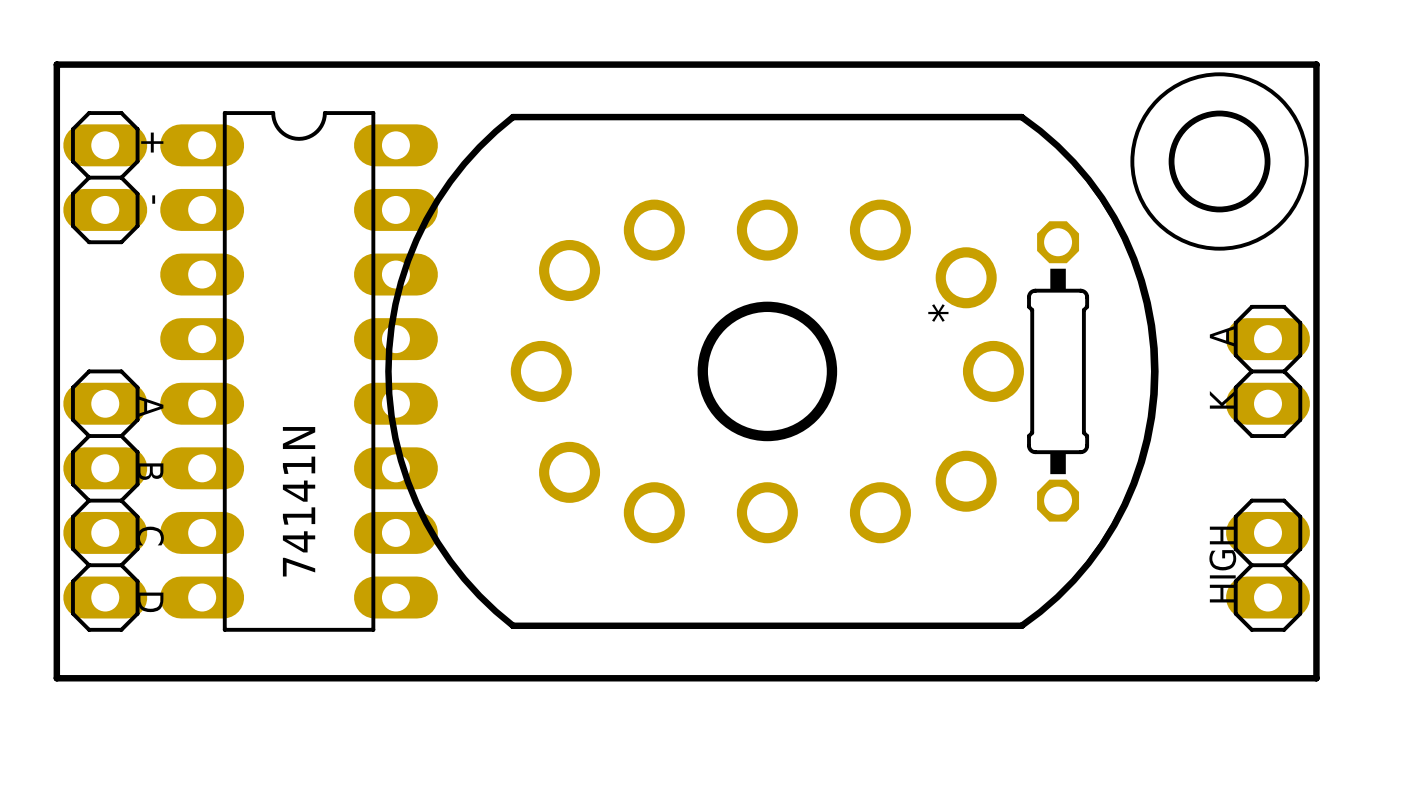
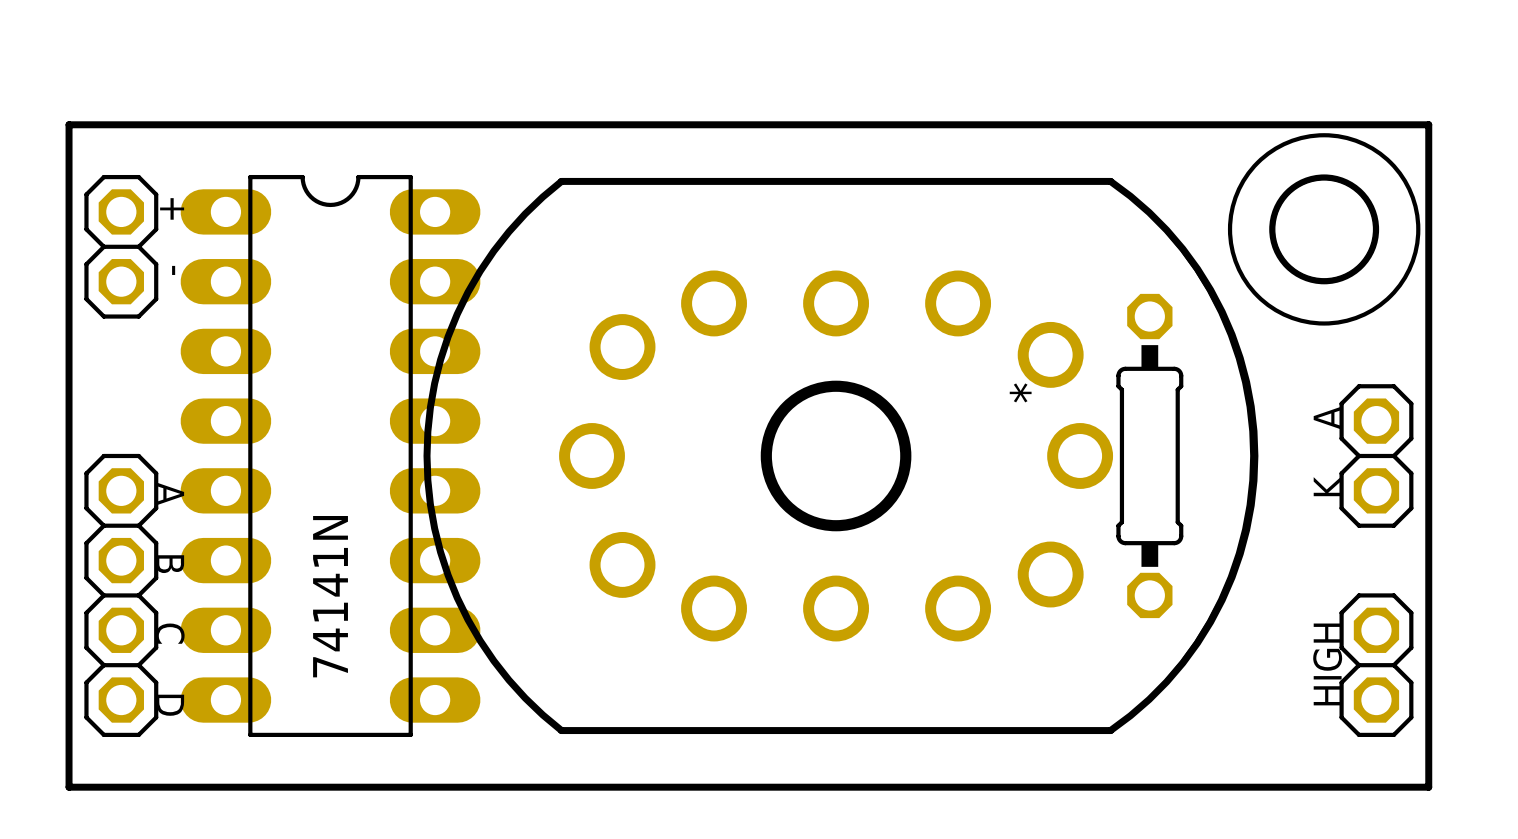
part footprint: [63, 111, 148, 245] -> [84, 174, 159, 319]
part footprint: [1226, 304, 1310, 438] -> [1339, 384, 1414, 528]
part footprint: [63, 369, 148, 632] -> [84, 453, 159, 737]
part footprint: [1226, 498, 1310, 632] -> [1339, 593, 1414, 737]

